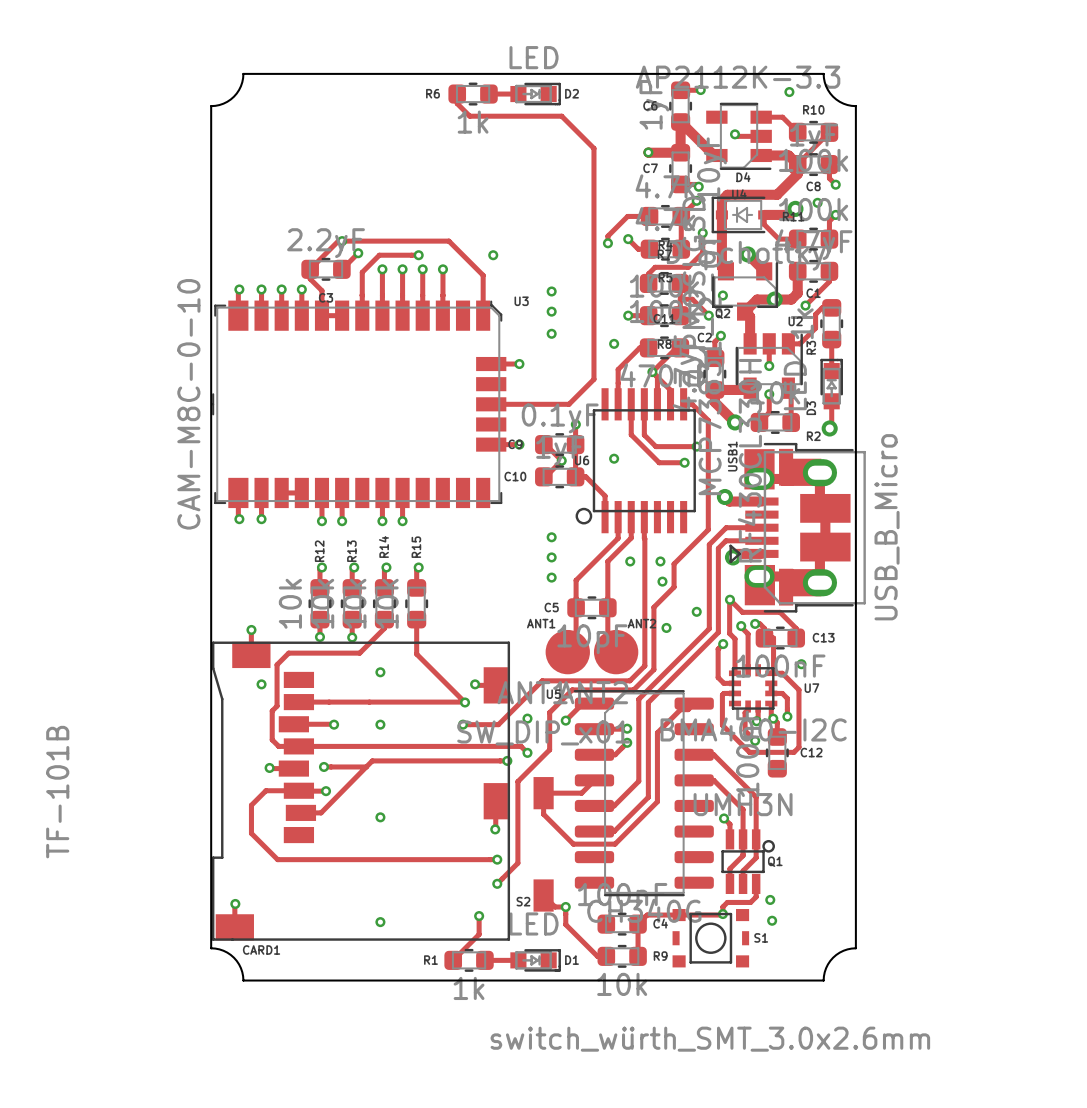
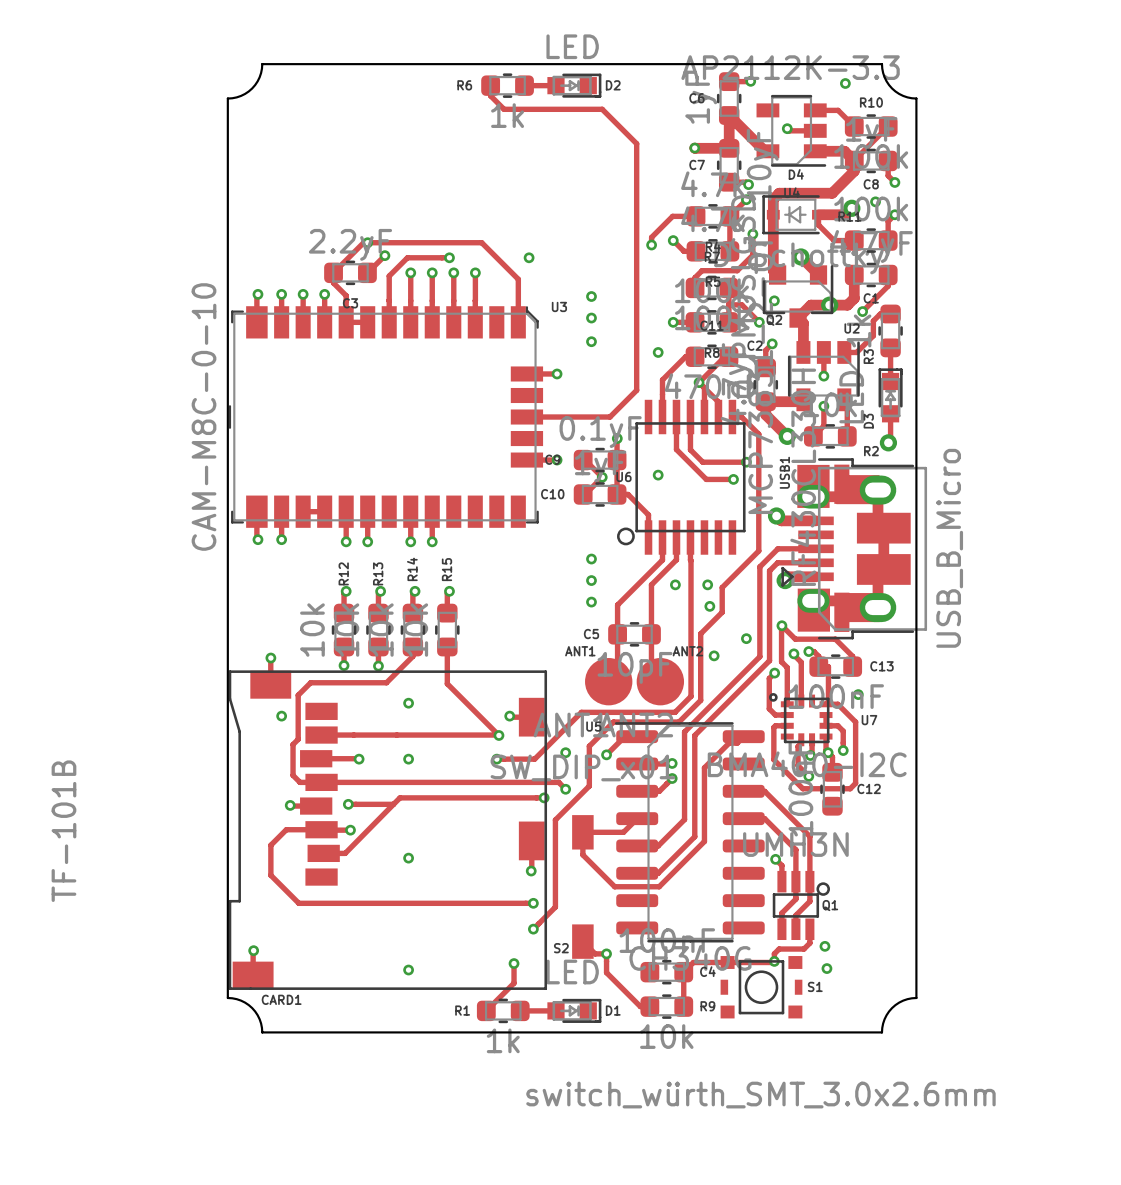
U7 footprint: [728, 664, 778, 713] -> [768, 693, 833, 747]

